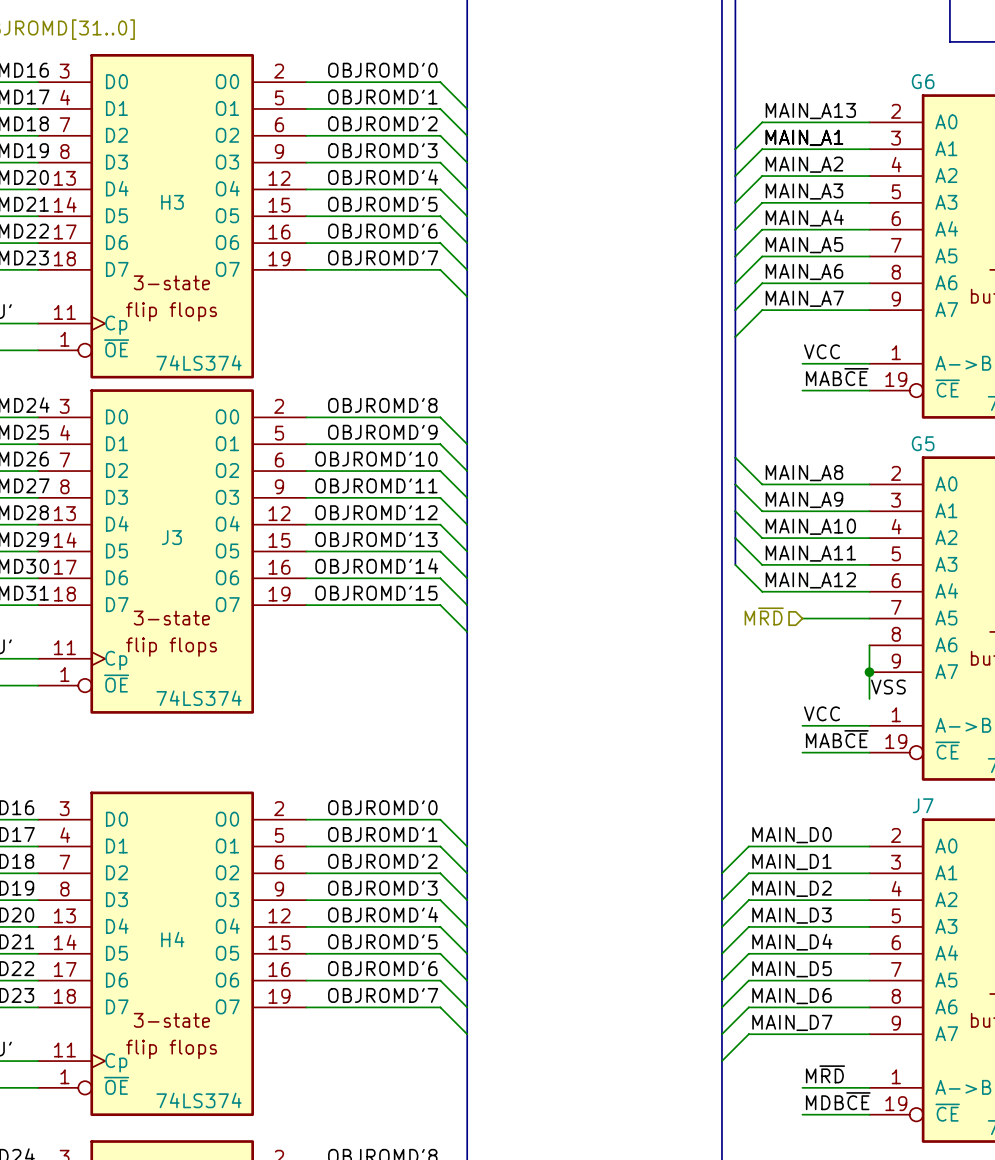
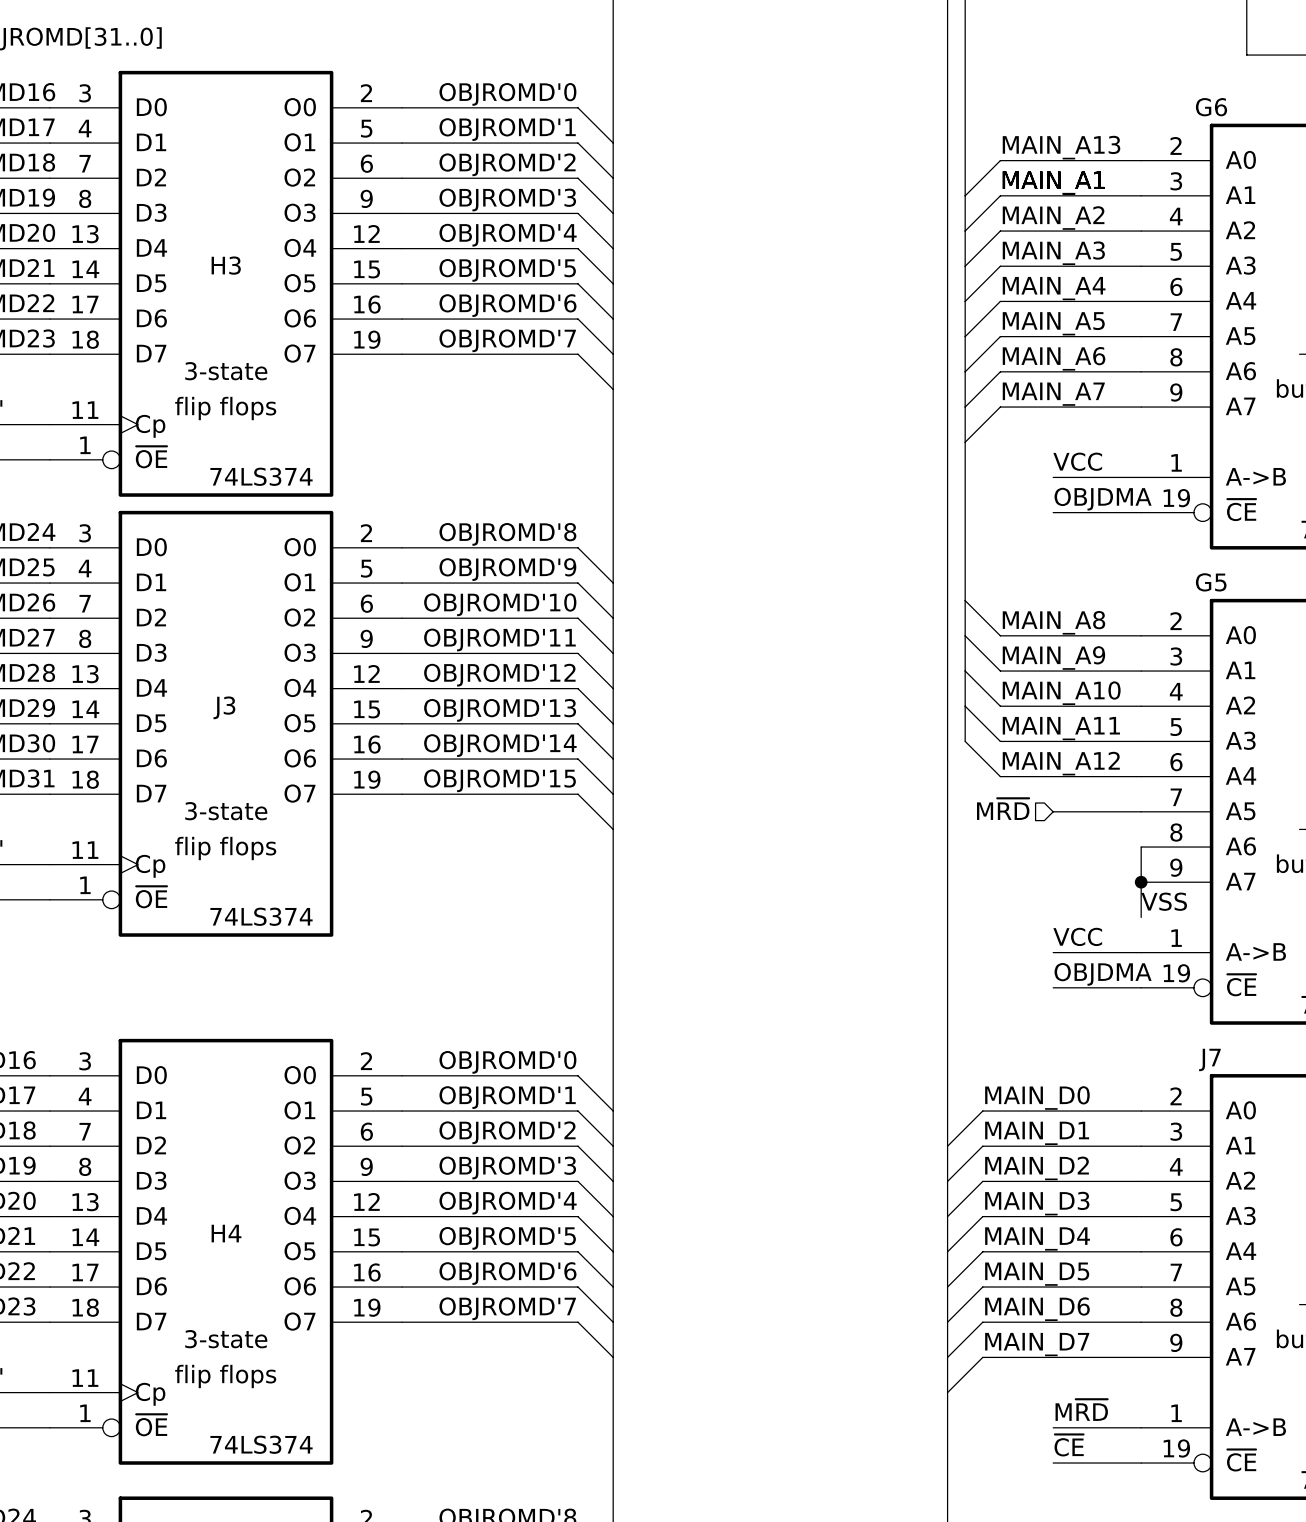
label: MAB~{CE} (837, 377) -> OBJDMA (1103, 499)
label: MAB~{CE} (837, 739) -> OBJDMA (1103, 974)
label: MDB~{CE} (838, 1101) -> ~{CE} (1069, 1445)

